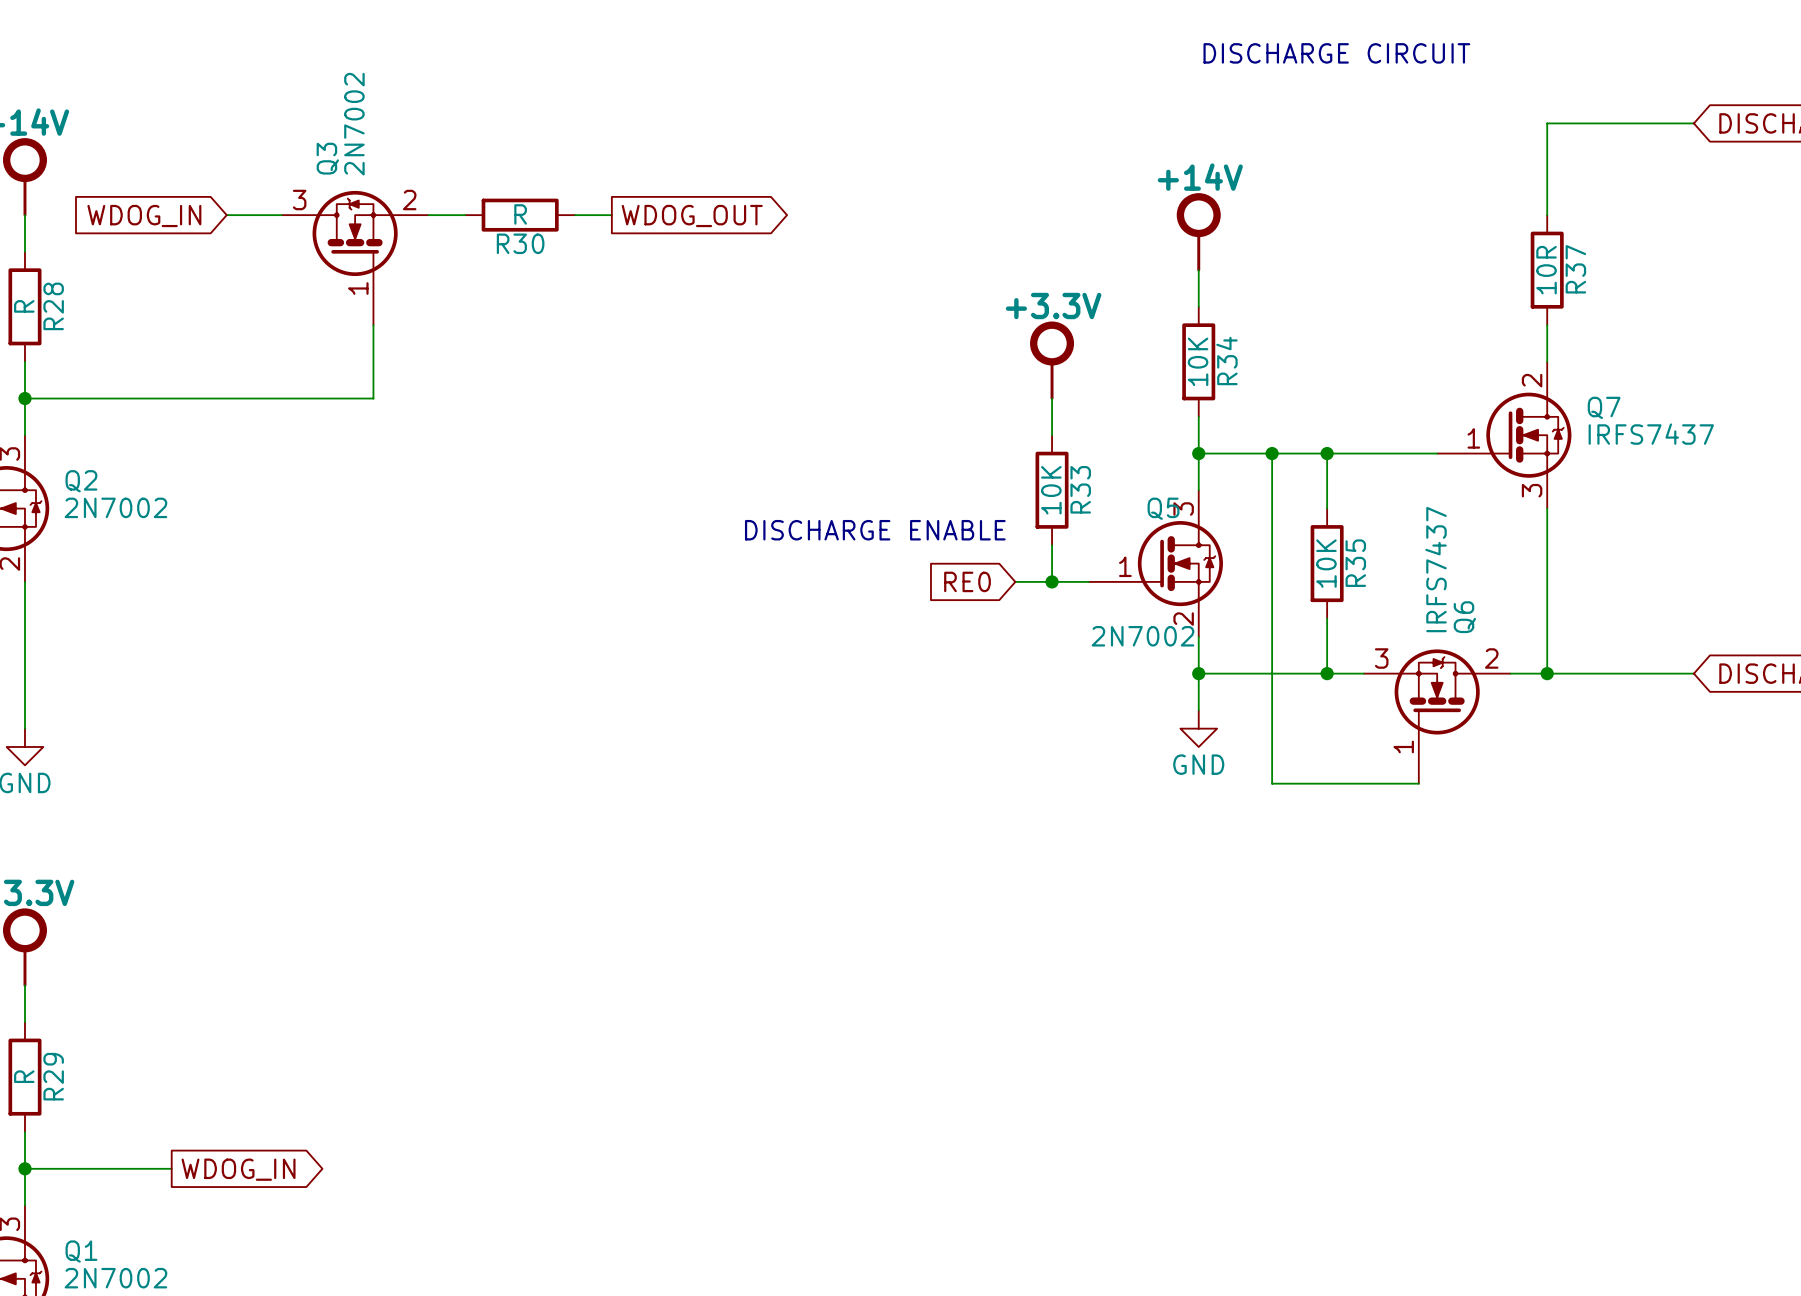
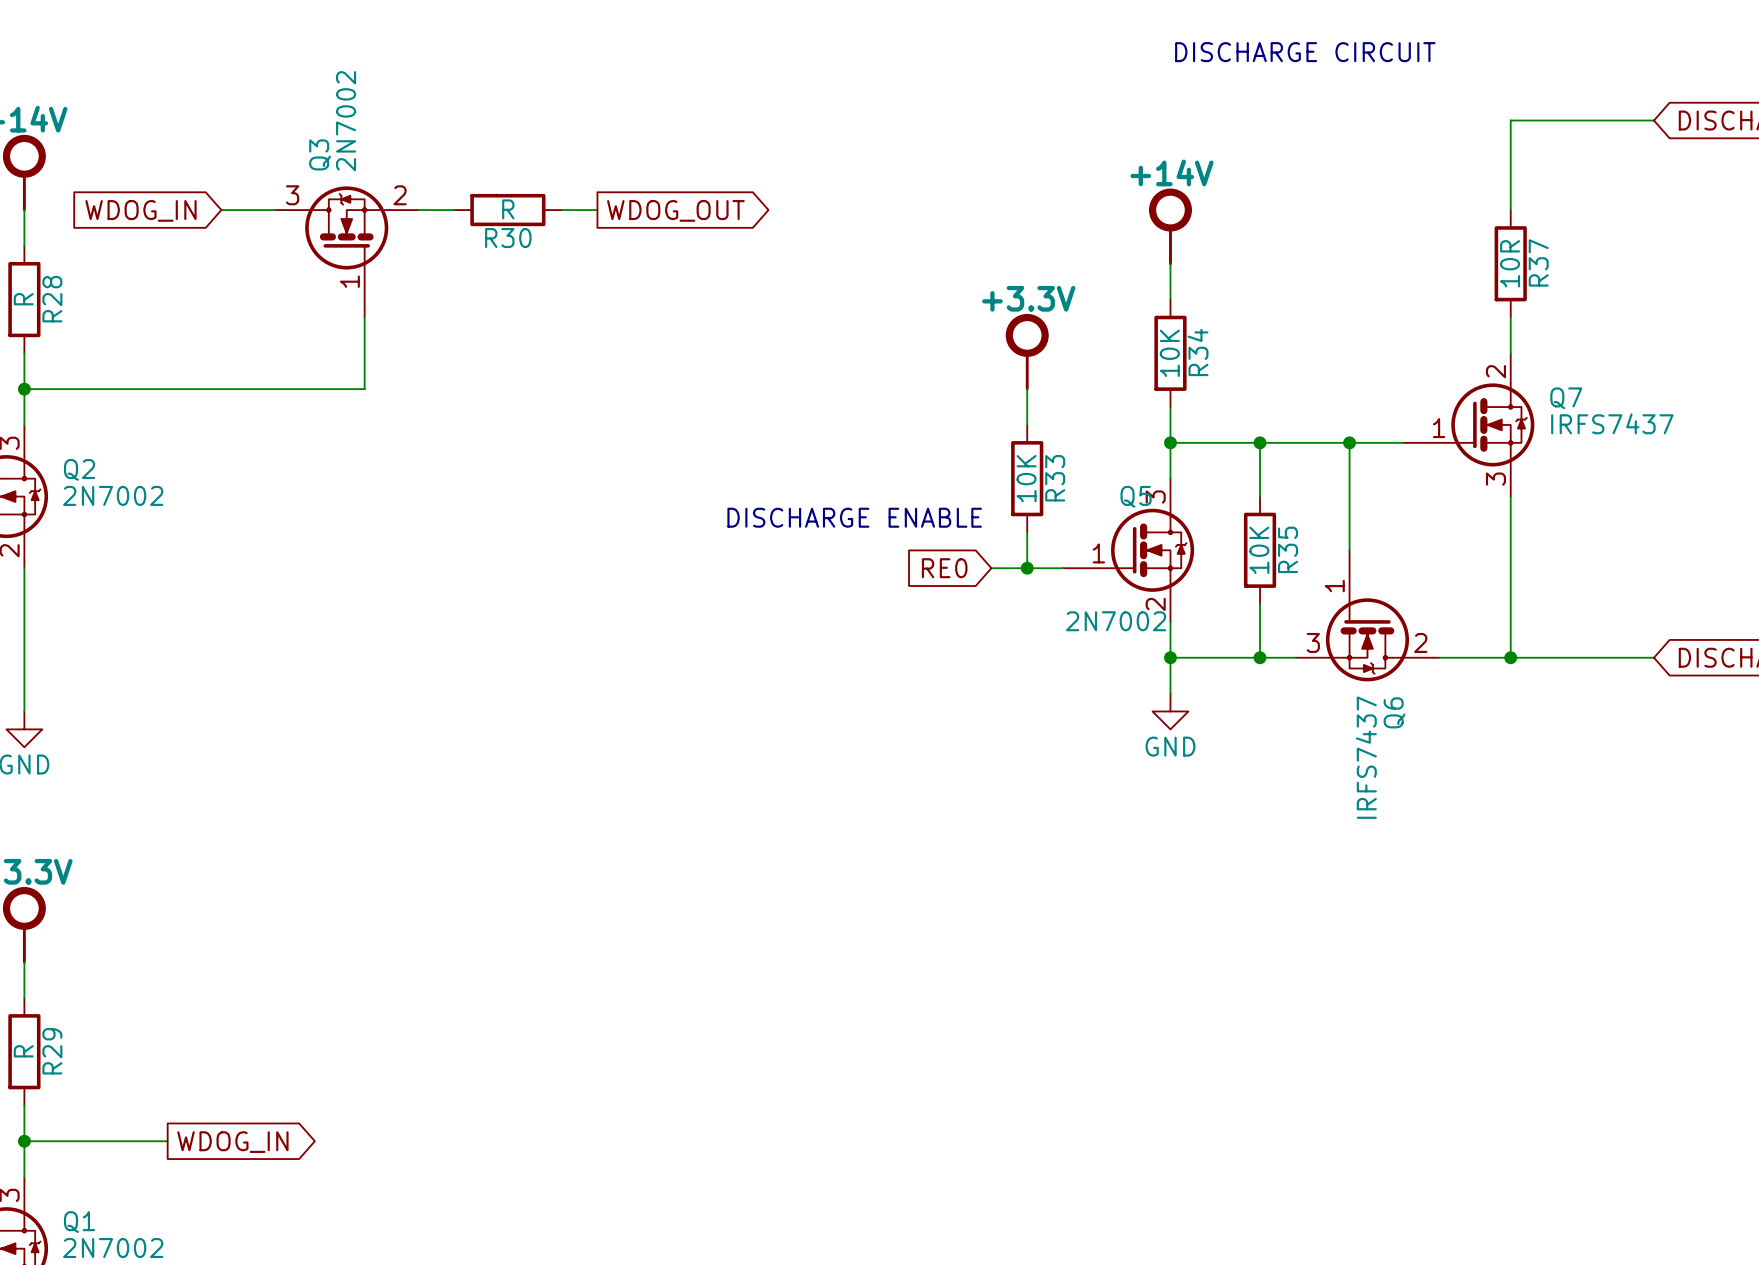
wire: (1272, 453) (1272, 783) (1418, 783) -> none
junction: (1272, 453) -> none
junction: none -> (1260, 442)
wire: (1327, 453) (1327, 508) -> (1260, 442) (1260, 496)
junction: (1327, 453) -> none
wire: none -> (1349, 442) (1349, 550)
junction: none -> (1349, 442)
R35 position: (1327, 563) -> (1260, 550)
wire: none -> (1260, 604) (1260, 657)
wire: (1327, 618) (1327, 673) (1363, 673) -> none
junction position: (1327, 673) -> (1260, 657)
Q6 flip: as is (1437, 691) -> up-down (1367, 639)
Q6 position: (1437, 716) -> (1367, 615)

